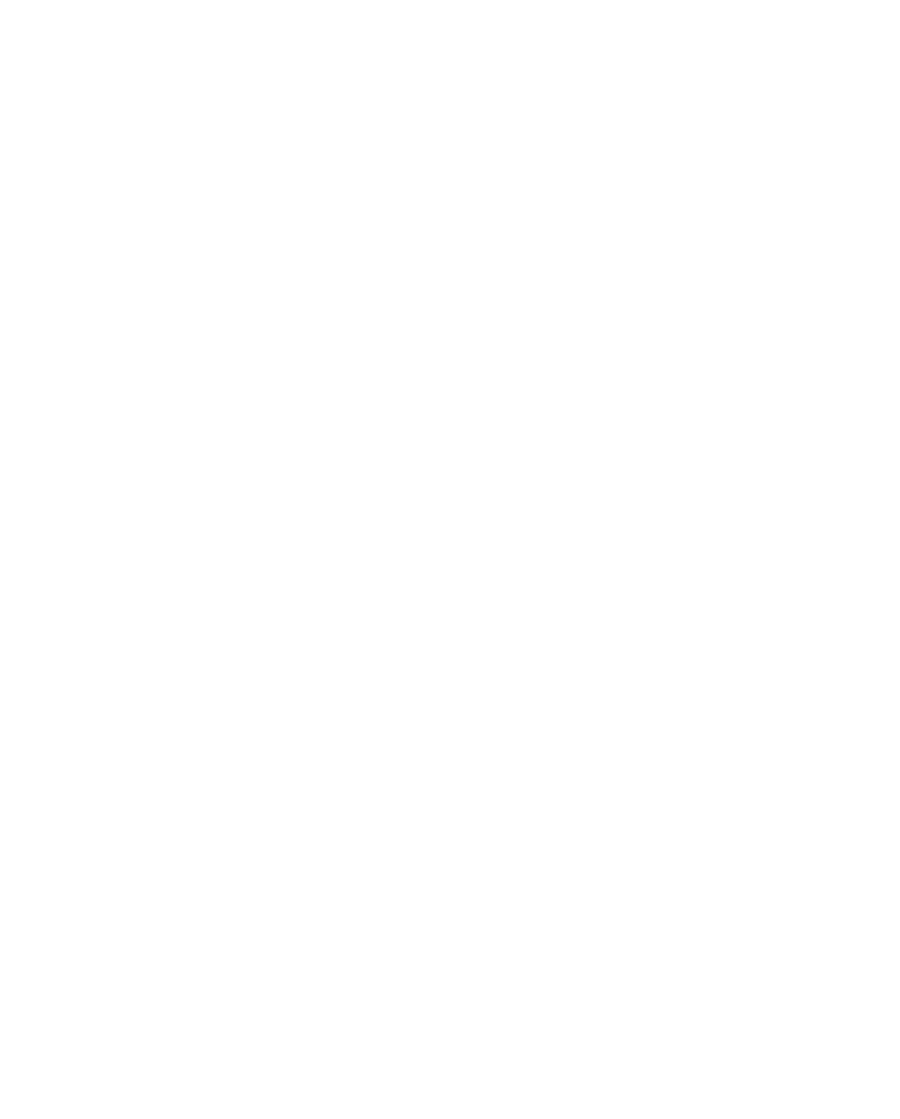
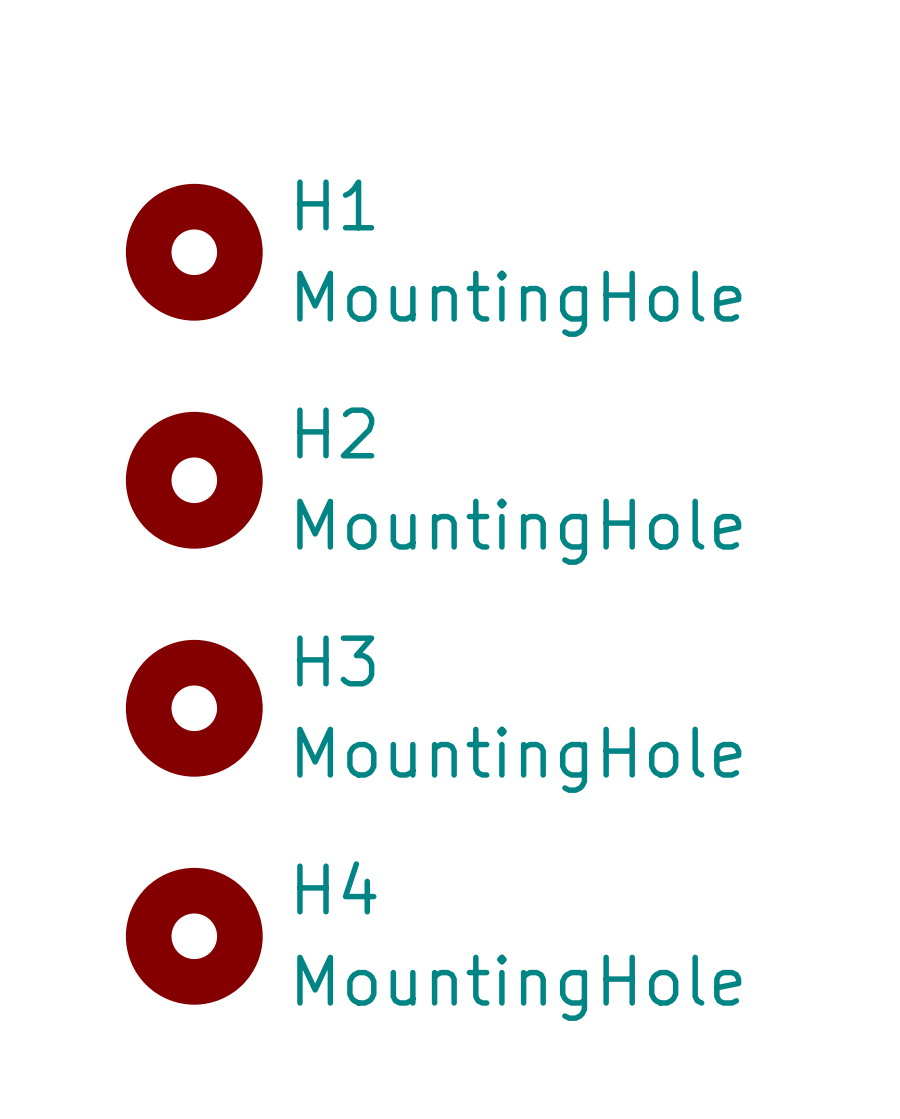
H1: none -> MountingHole (194, 252)
H2: none -> MountingHole (194, 480)
H3: none -> MountingHole (194, 708)
H4: none -> MountingHole (194, 936)

